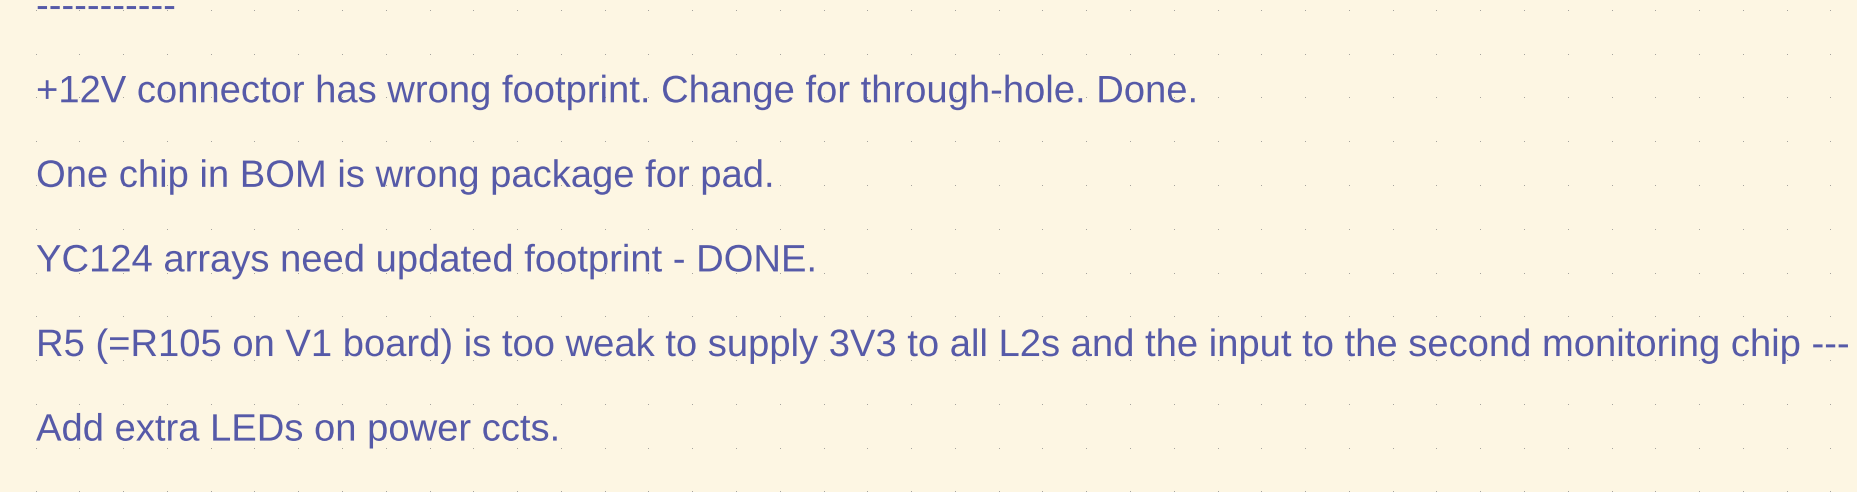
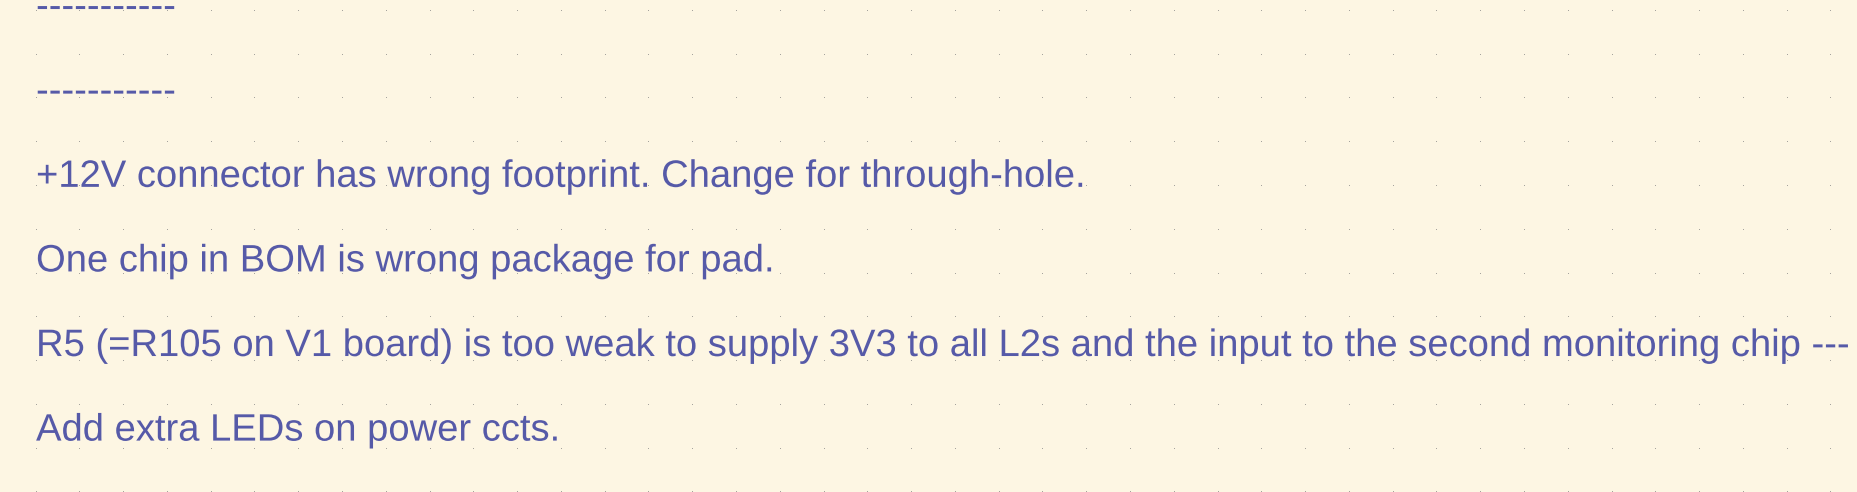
text: +12V connector has wrong footprint. Change for through-hole. Done. (616, 92) -> ----------- (105, 92)
text: One chip in BOM is wrong package for pad. (404, 176) -> +12V connector has wrong footprint. Change for through-hole. (560, 176)
text: YC124 arrays need updated footprint - DONE. (425, 261) -> One chip in BOM is wrong package for pad. (404, 261)

